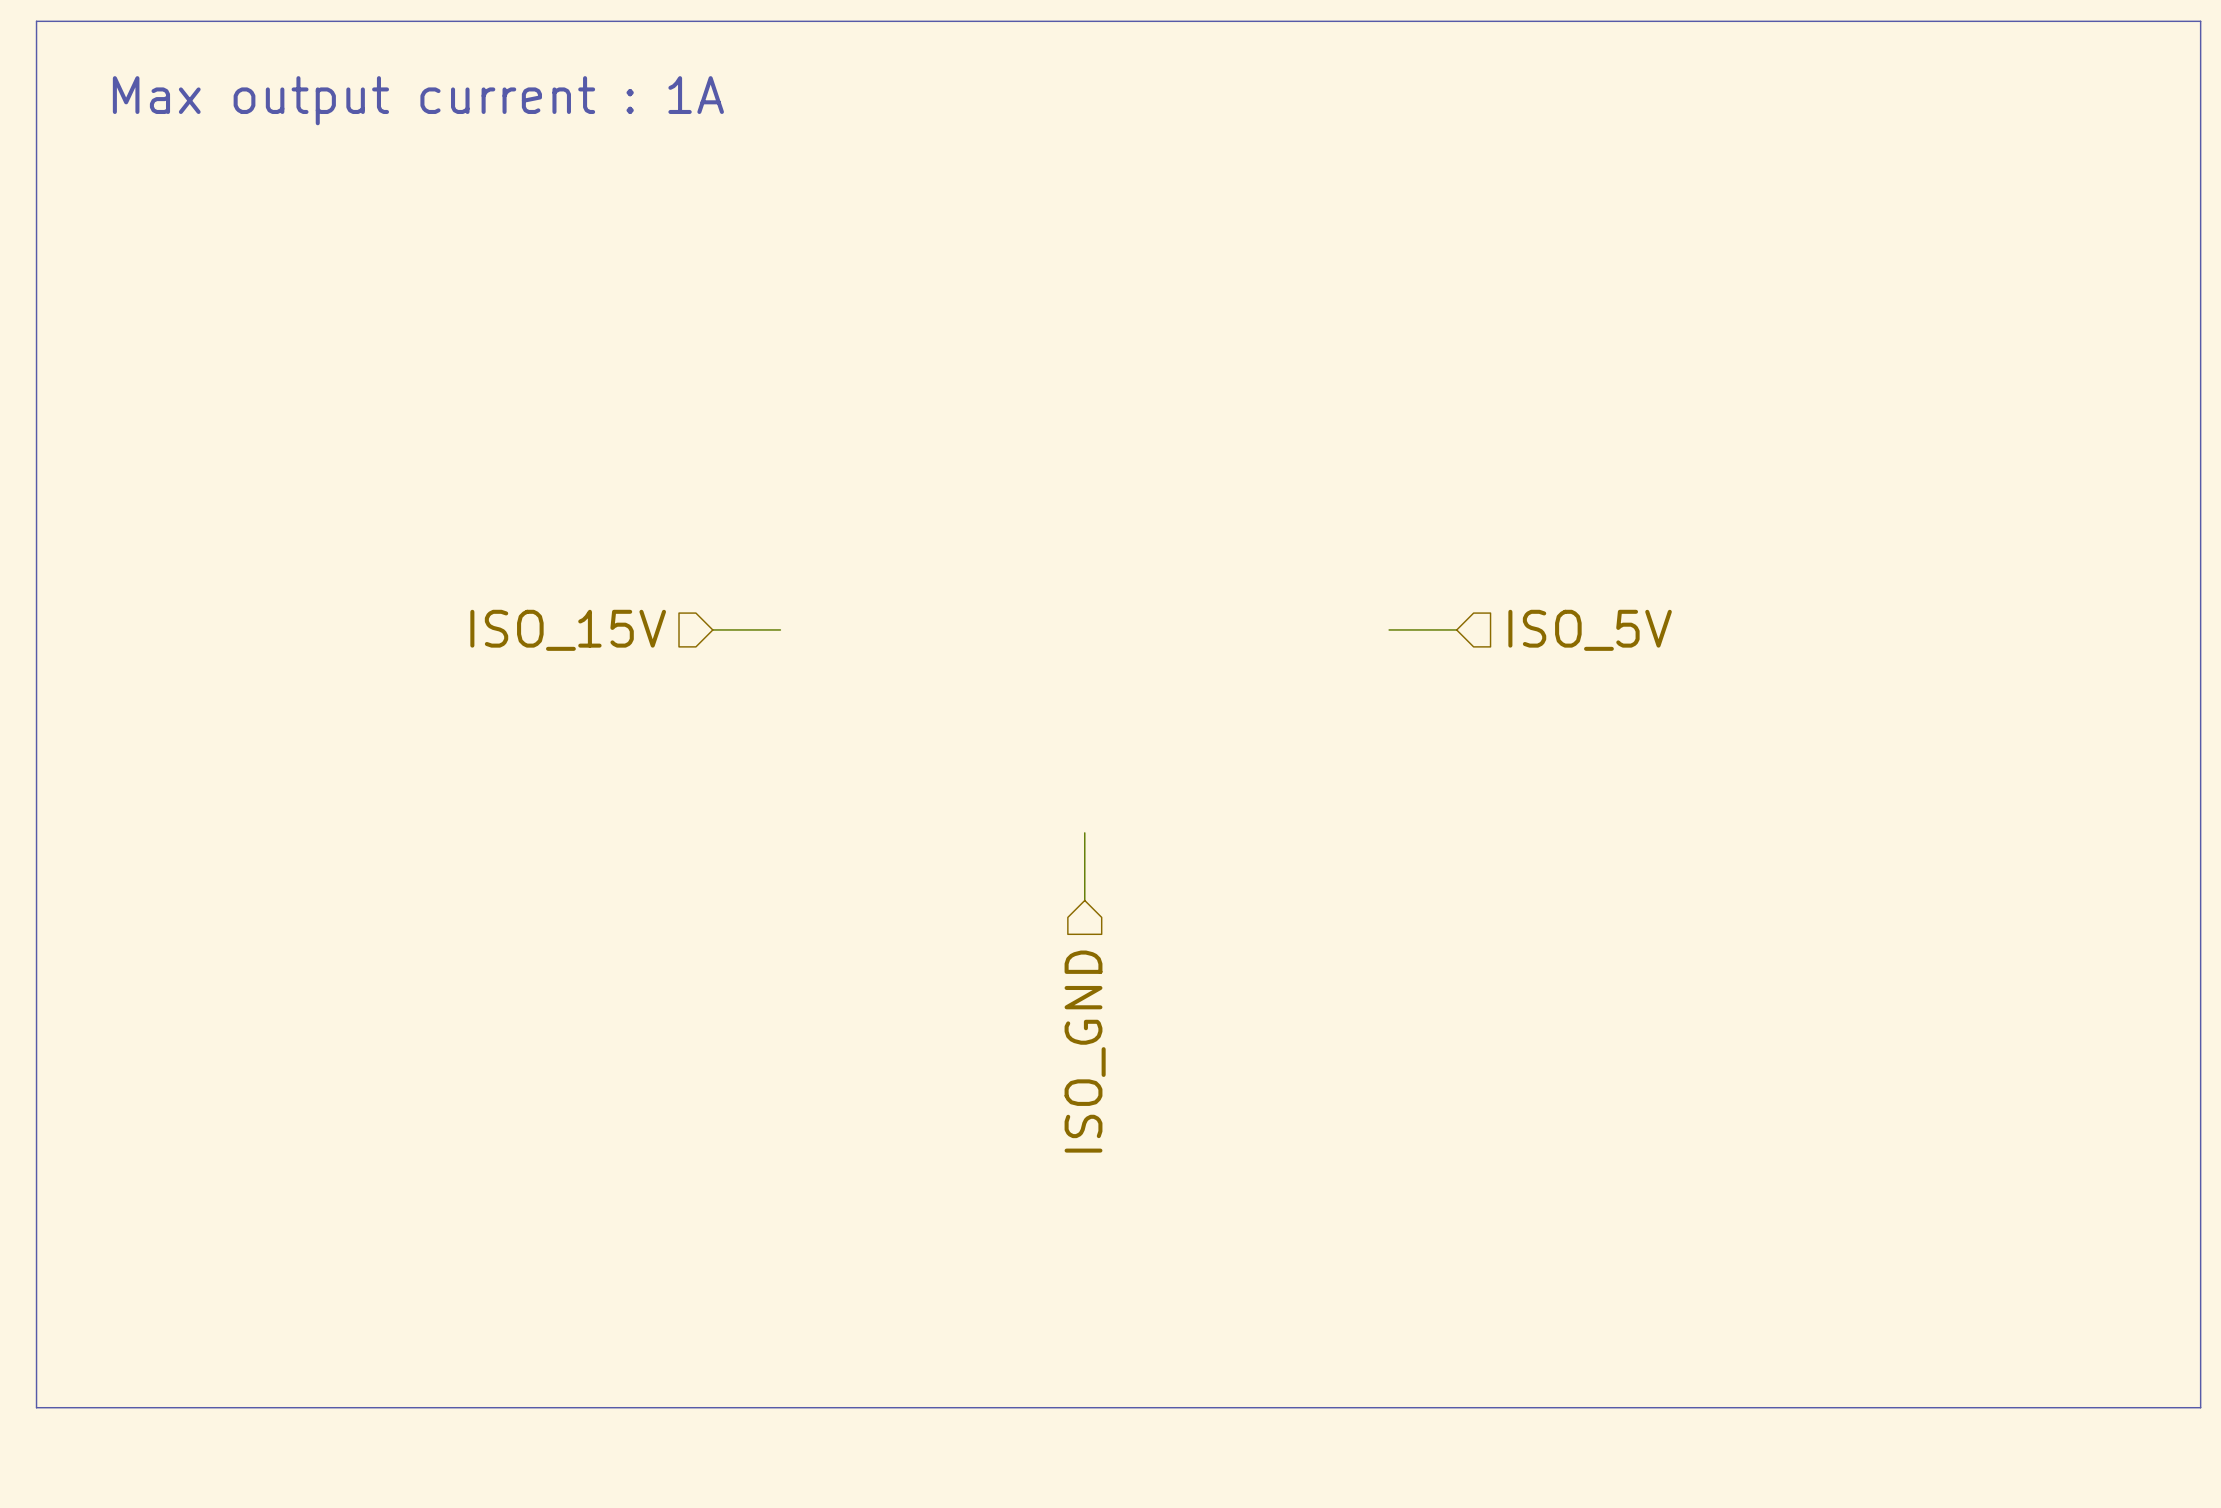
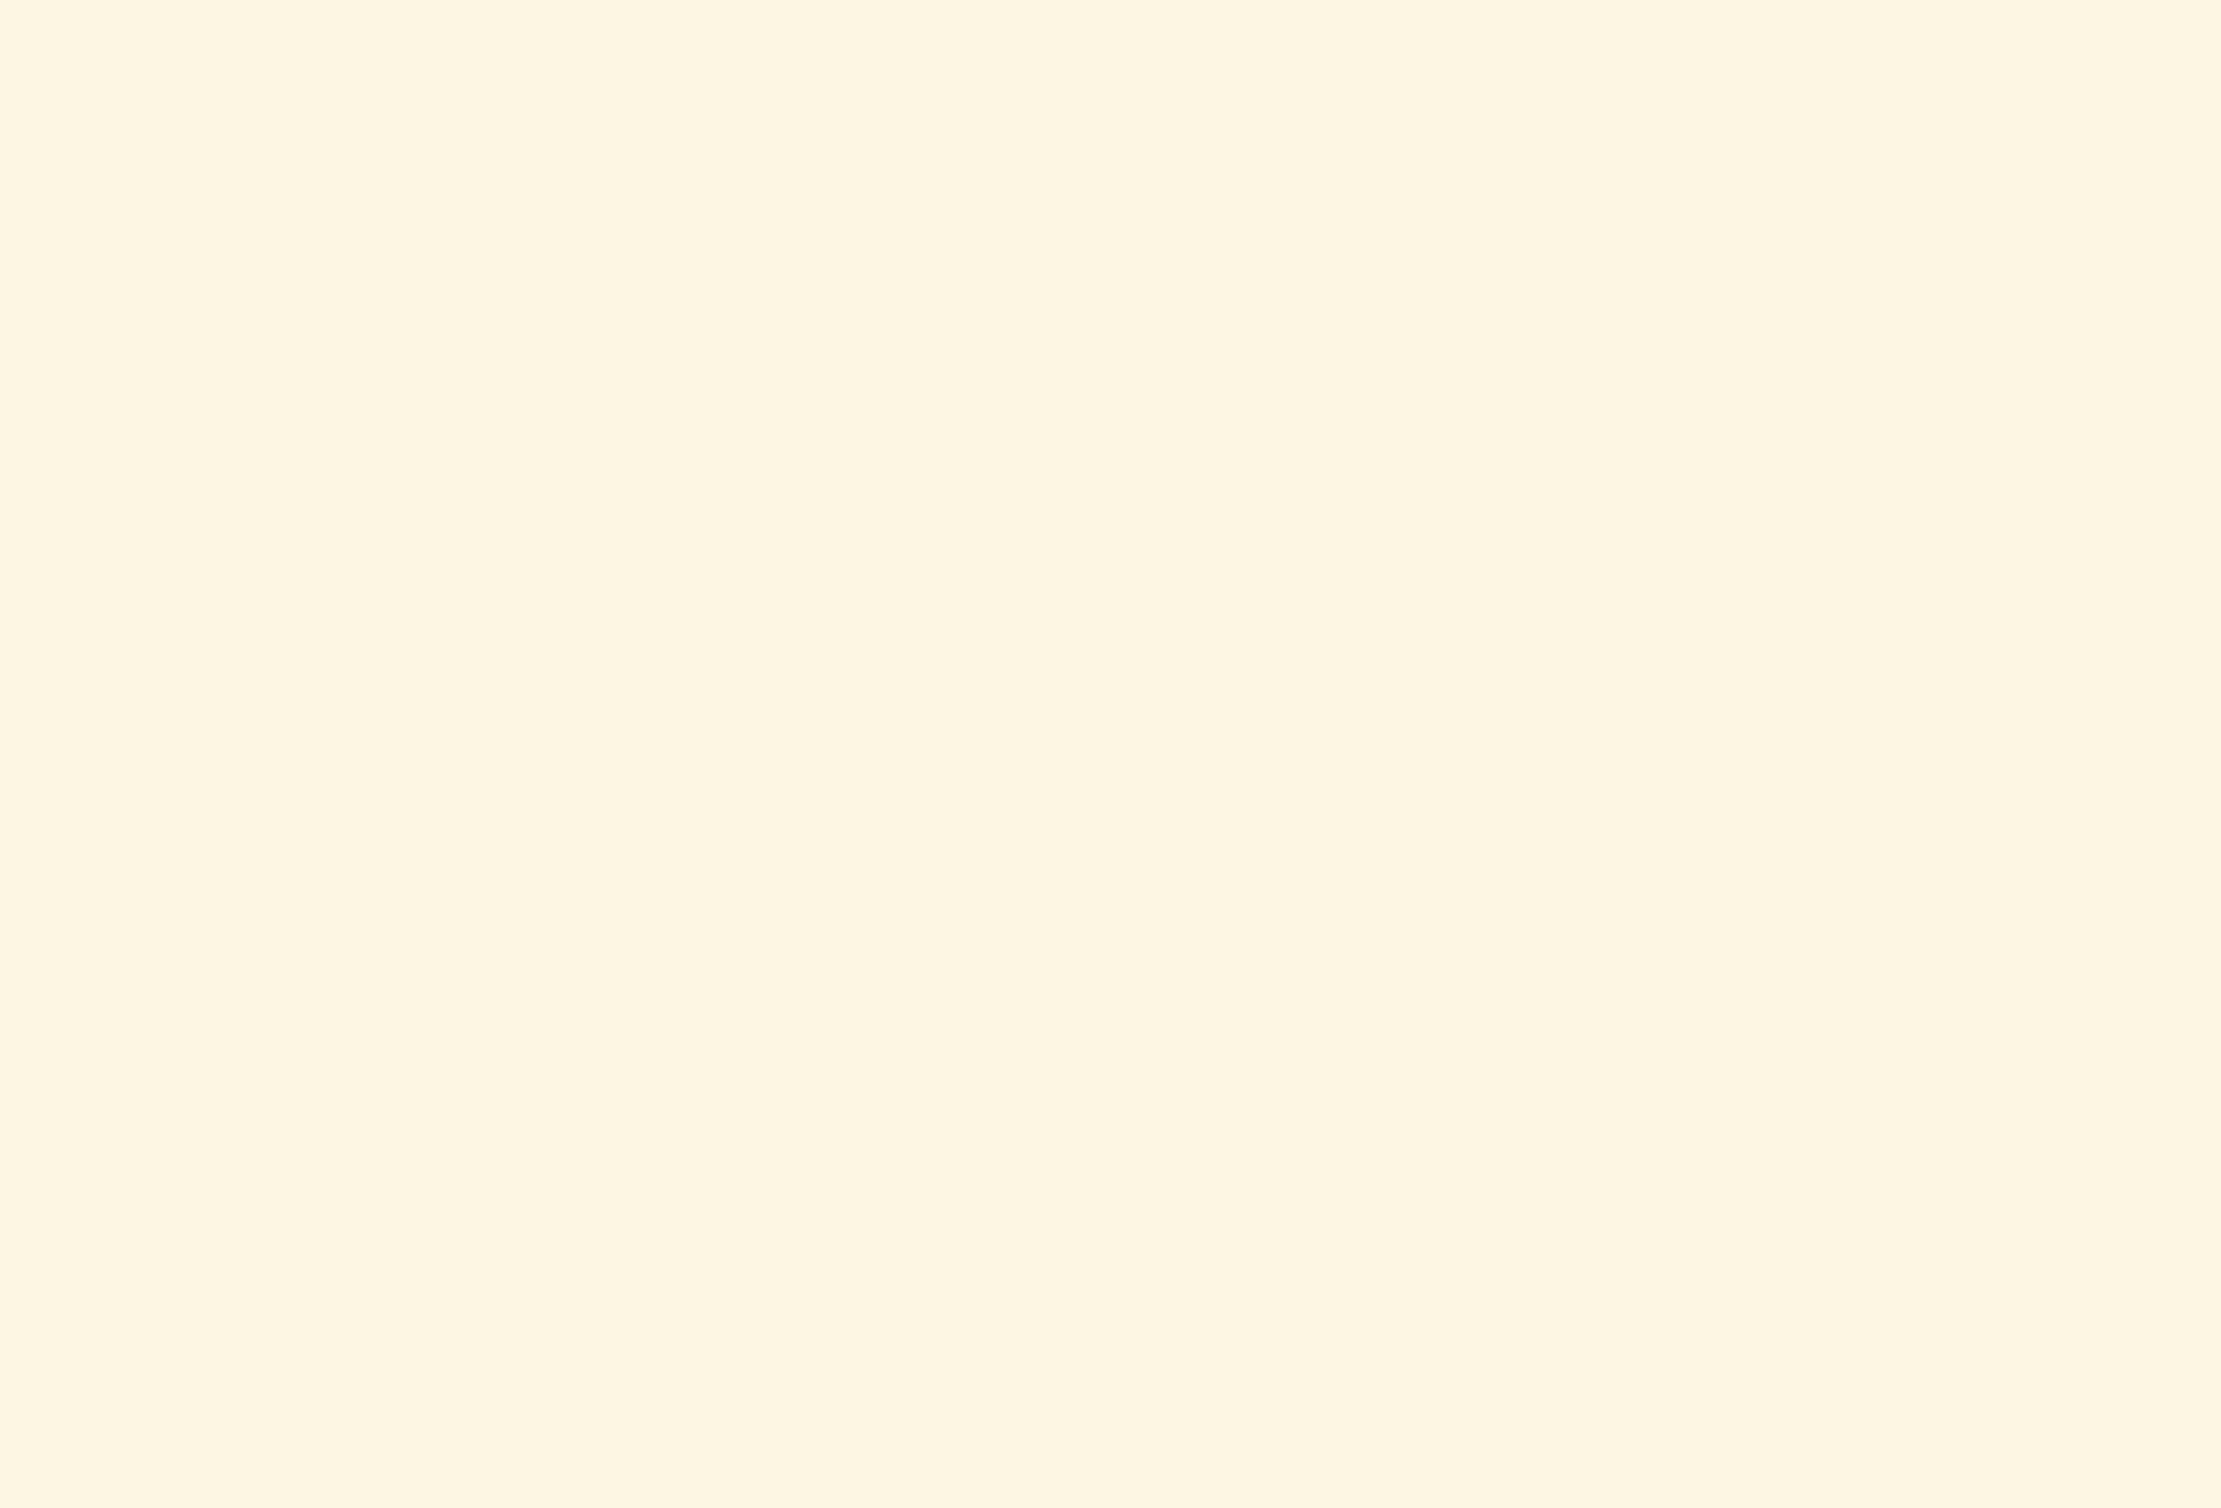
line: (36, 21) (2200, 21) (2200, 1407) (36, 1407) (36, 21) -> none
text: Max output current : 1A (418, 100) -> none
wire: (712, 629) (780, 629) -> none
wire: (1389, 629) (1456, 629) -> none
hierarchical label: ISO_15V (568, 630) -> none
hierarchical label: ISO_5V (1590, 630) -> none
wire: (1084, 832) (1084, 900) -> none
hierarchical label: ISO_GND (1085, 1051) -> none

